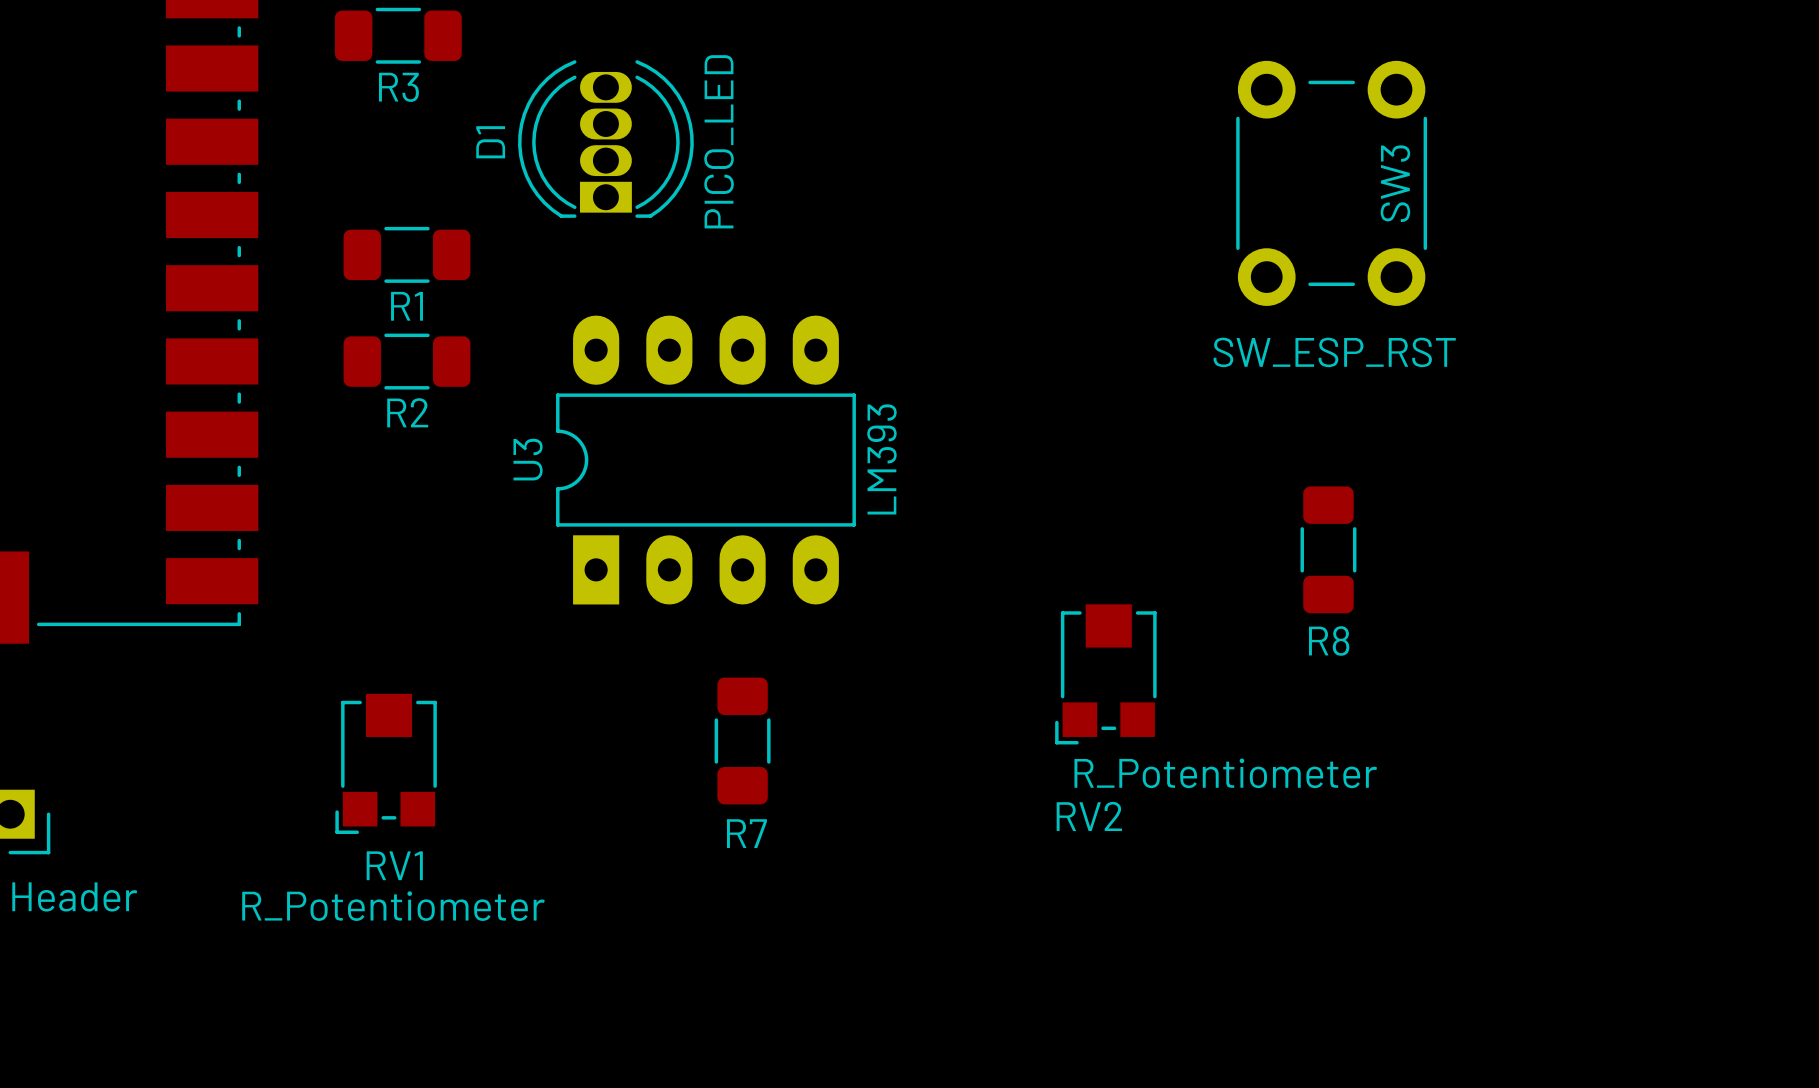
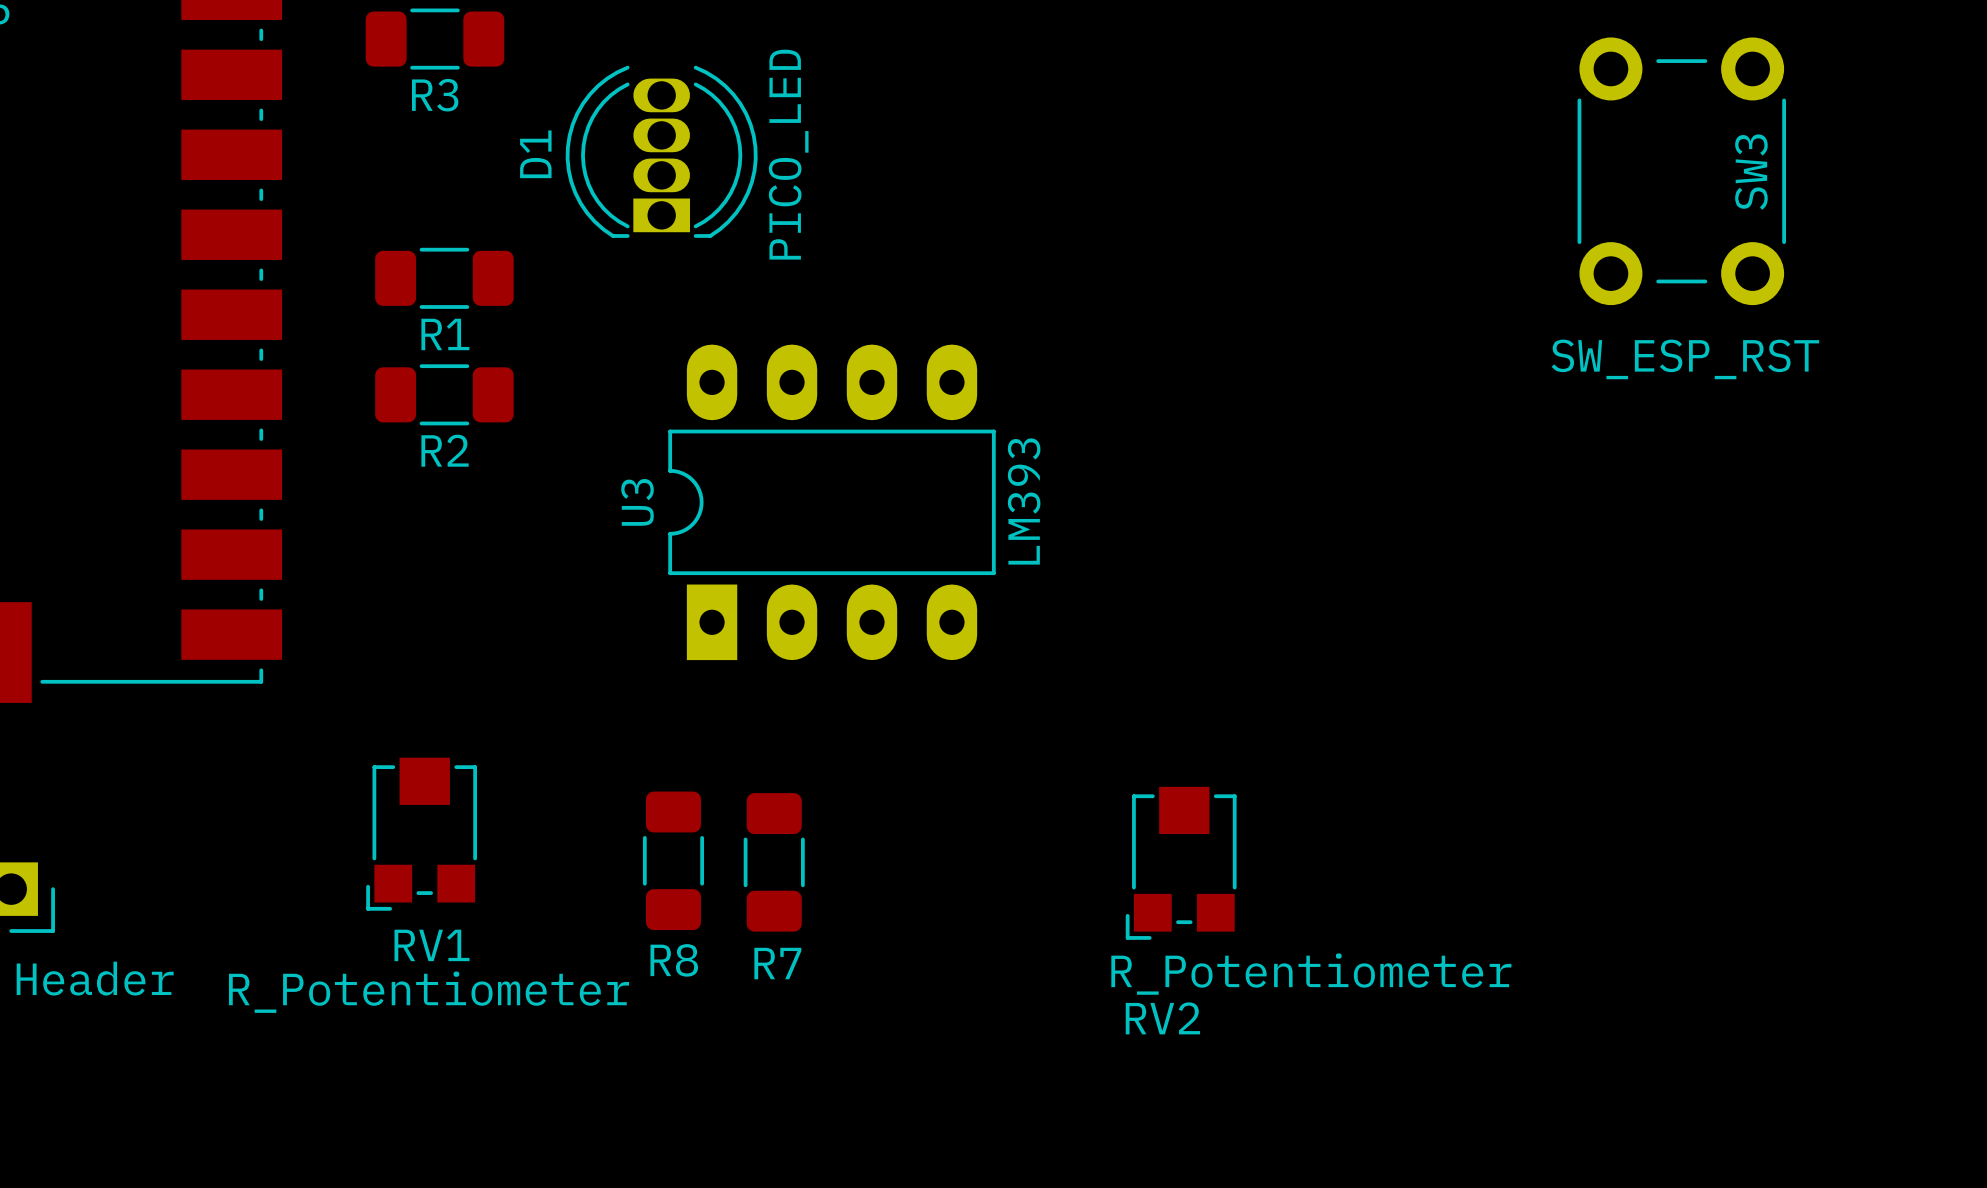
SW3 position: (1331, 183) -> (1681, 171)
U3 position: (705, 460) -> (832, 502)
R8 position: (1328, 549) -> (673, 860)
RV2 position: (1105, 674) -> (1181, 863)
R7 position: (742, 741) -> (774, 862)

